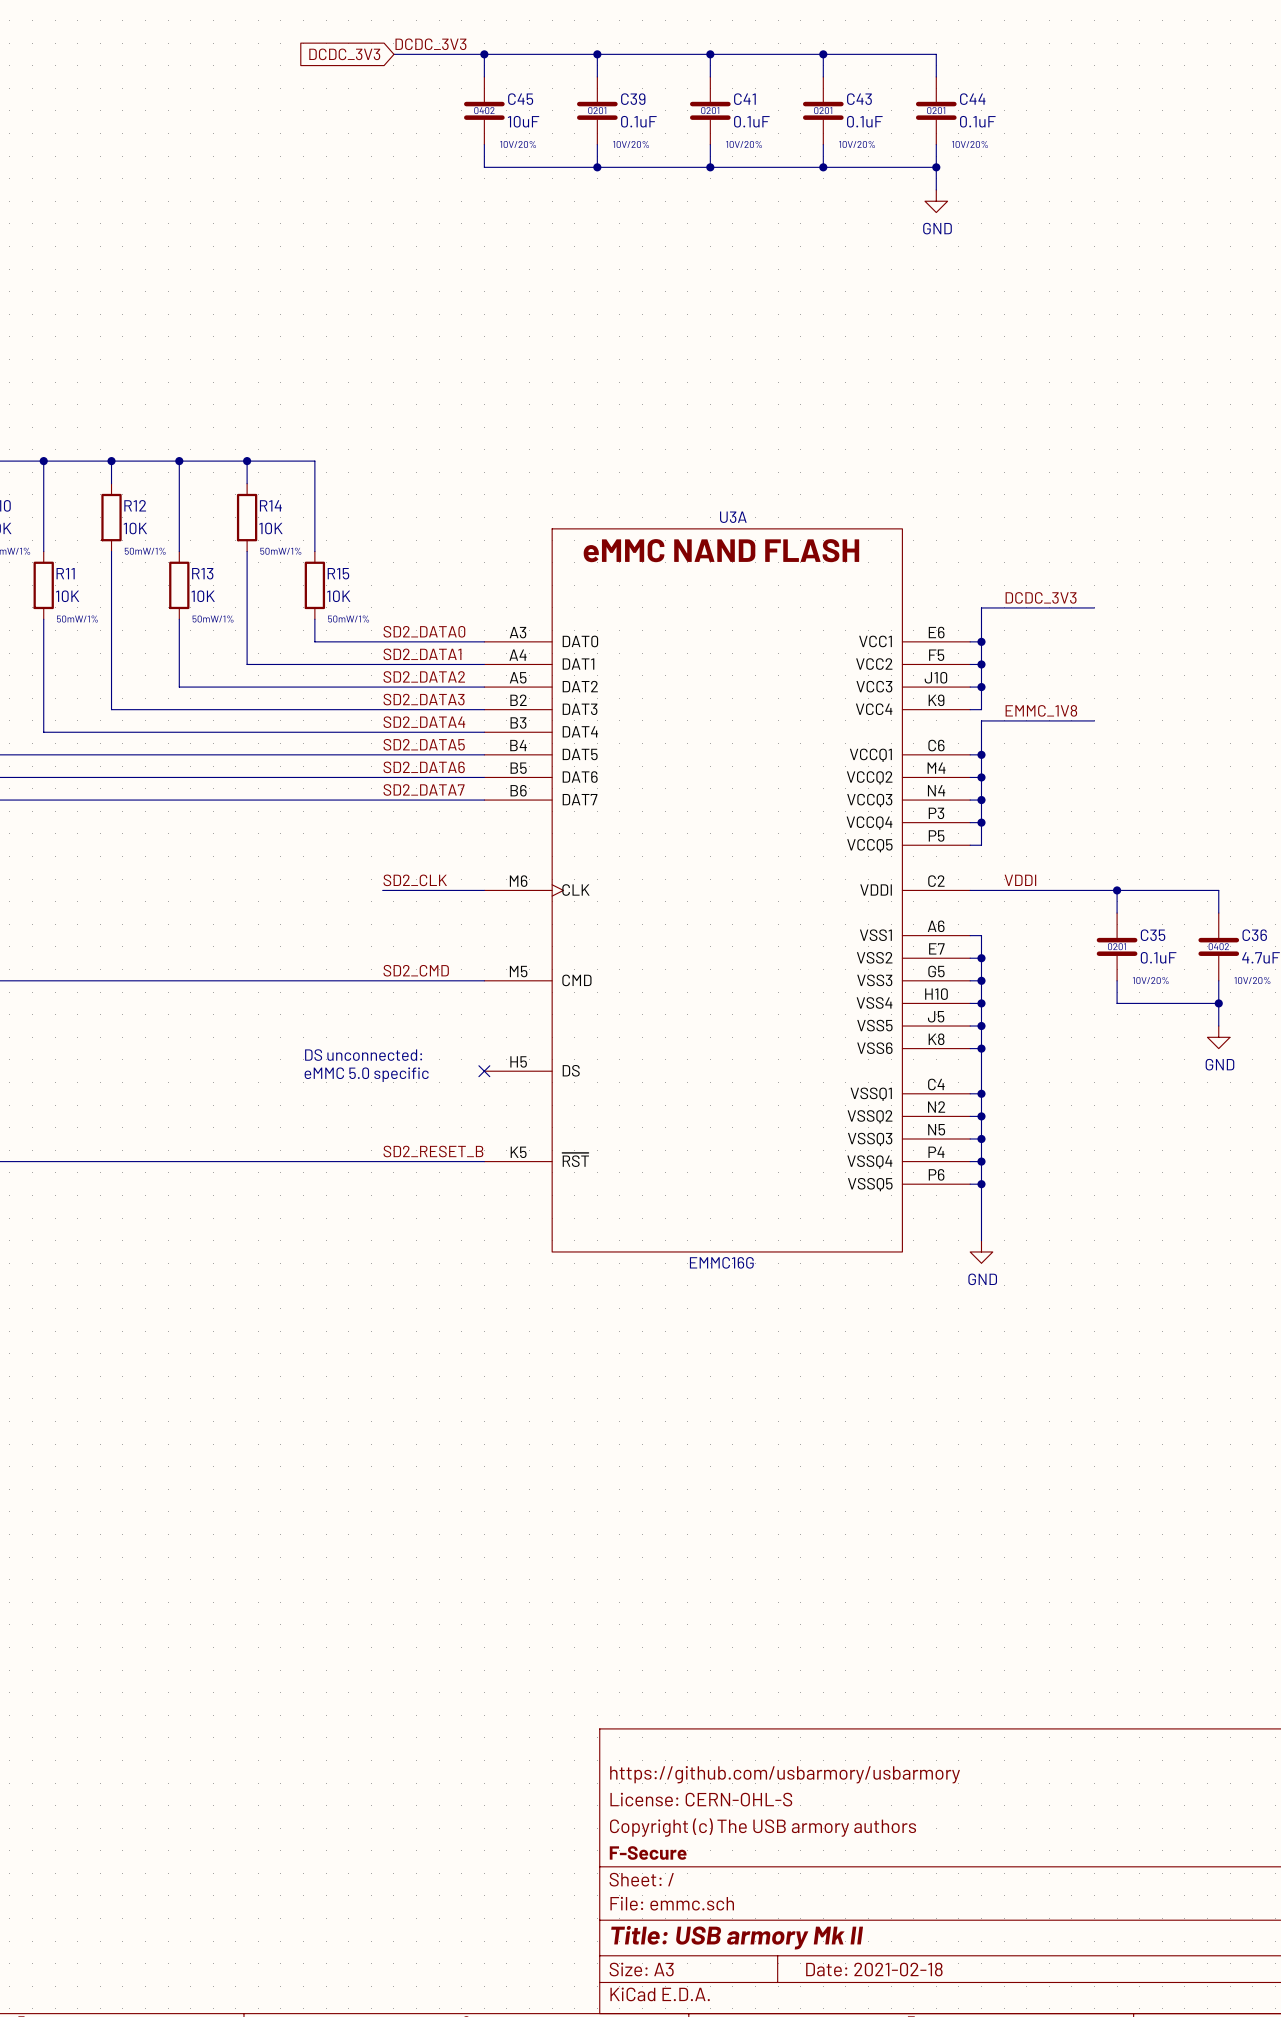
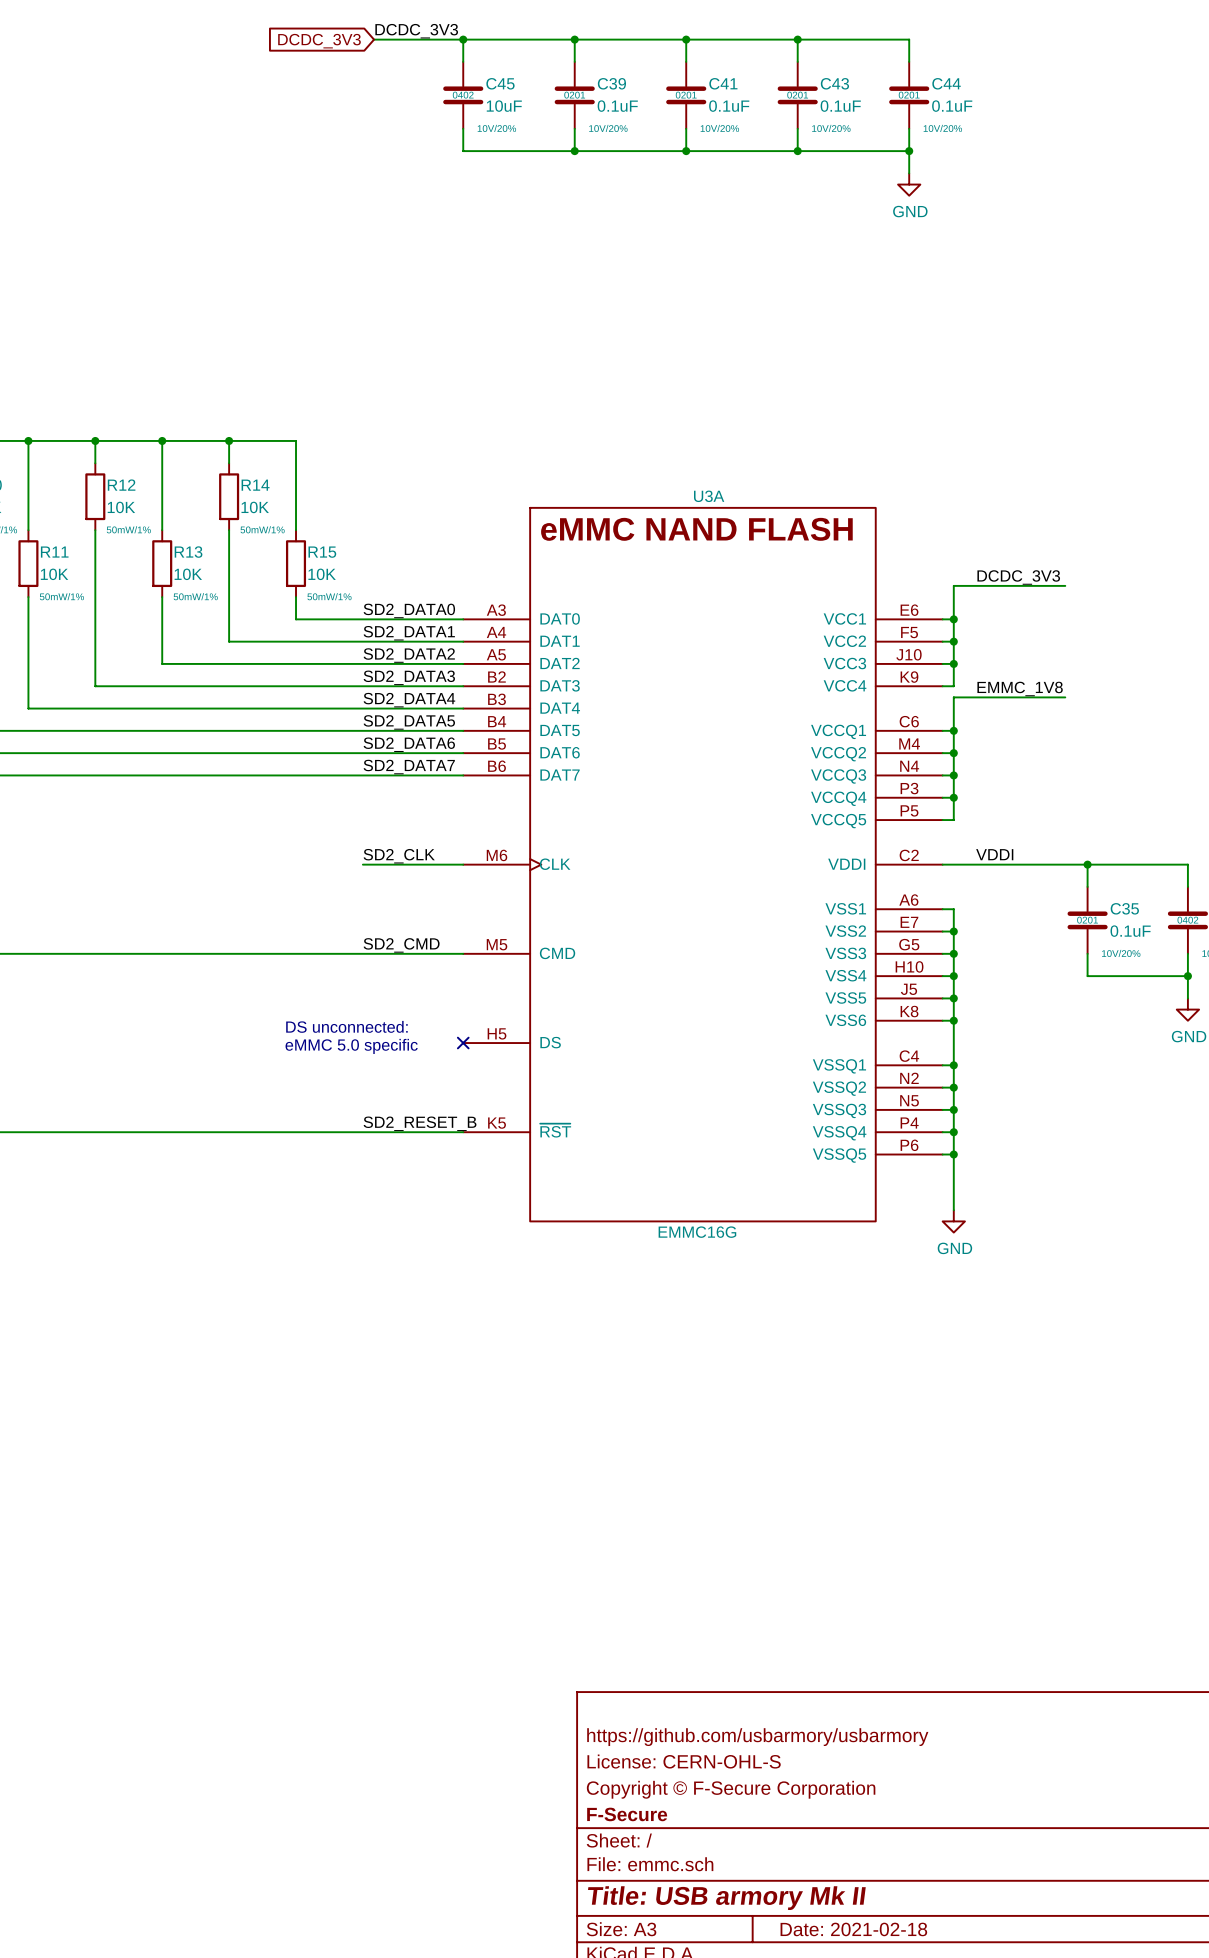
title block: Copyright (c) The USB armory authors (763, 1827) -> Copyright © F-Secure Corporation (731, 1789)

